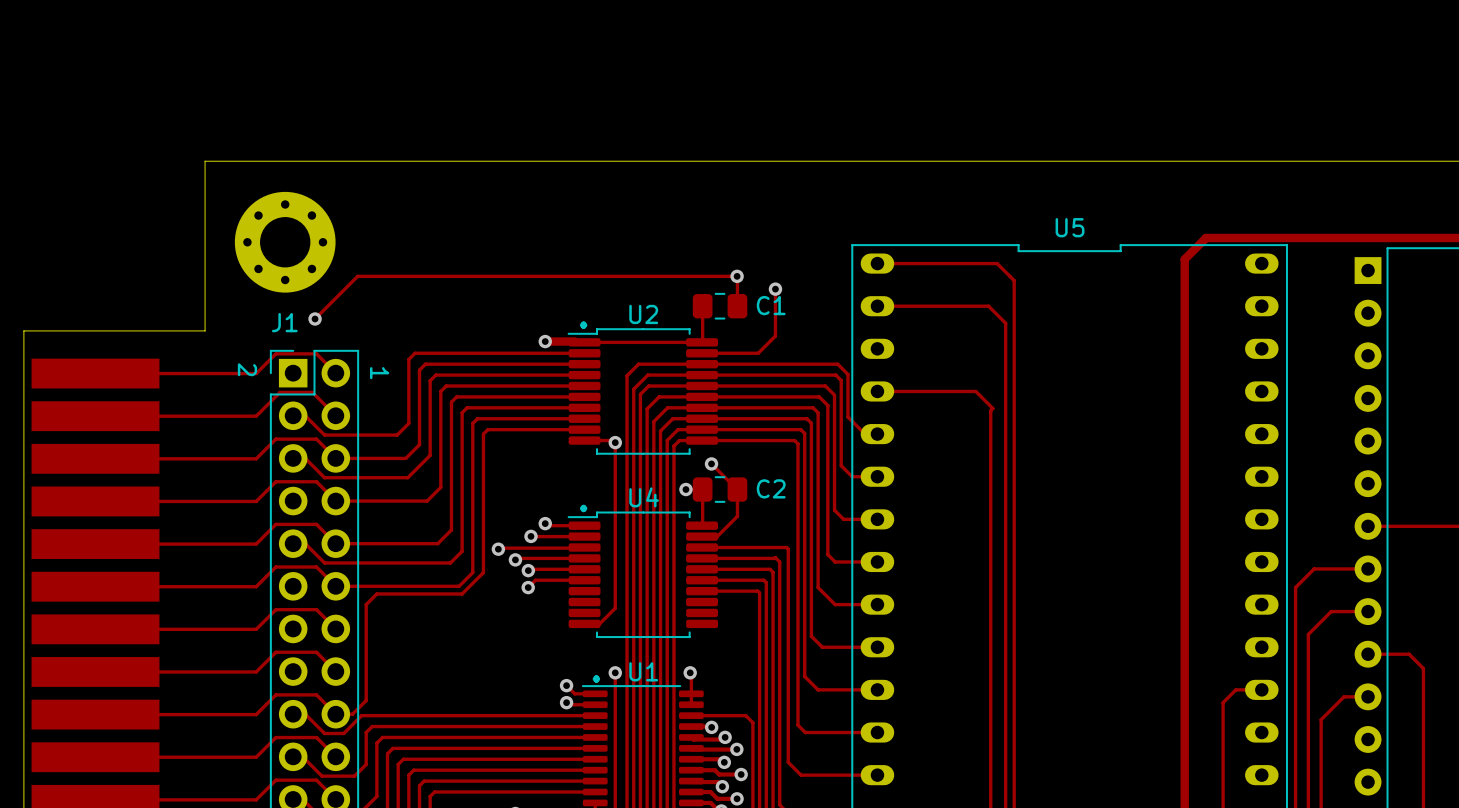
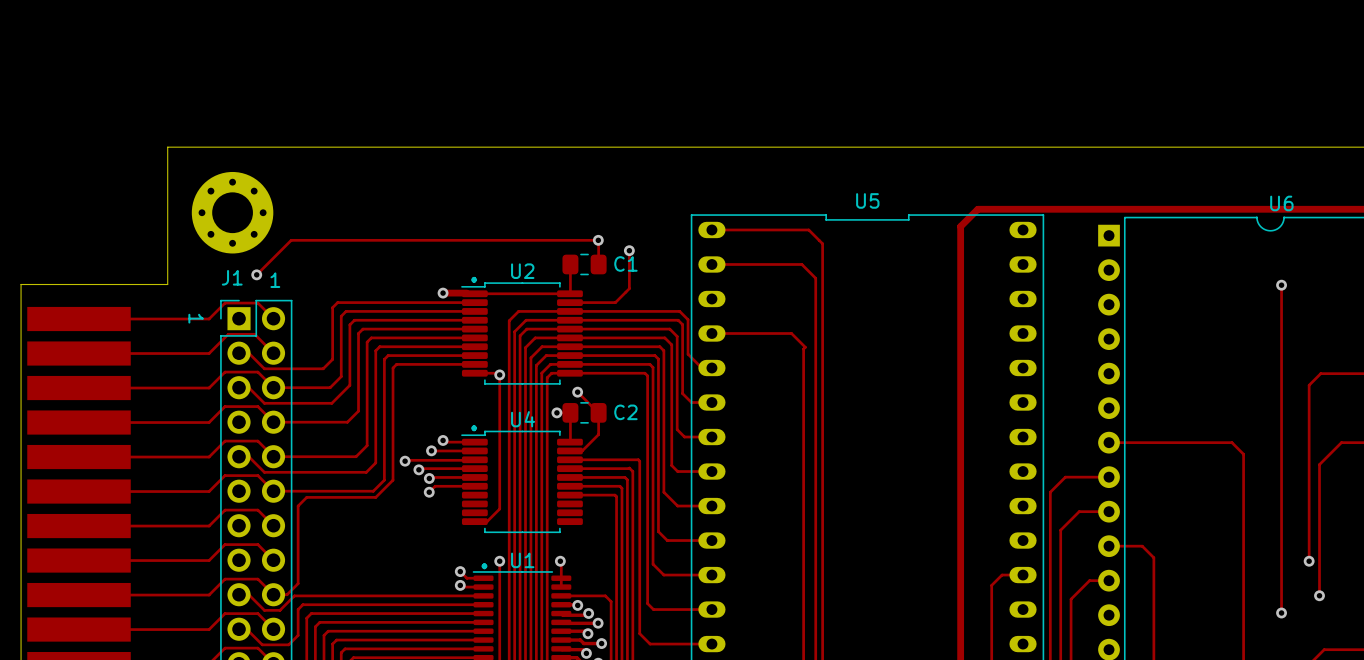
text: 2 (247, 369) -> 1 (196, 318)
text rotation: 0° (379, 373) -> 90° counterclockwise (275, 280)
text position: 1 (379, 373) -> 1 (275, 280)

